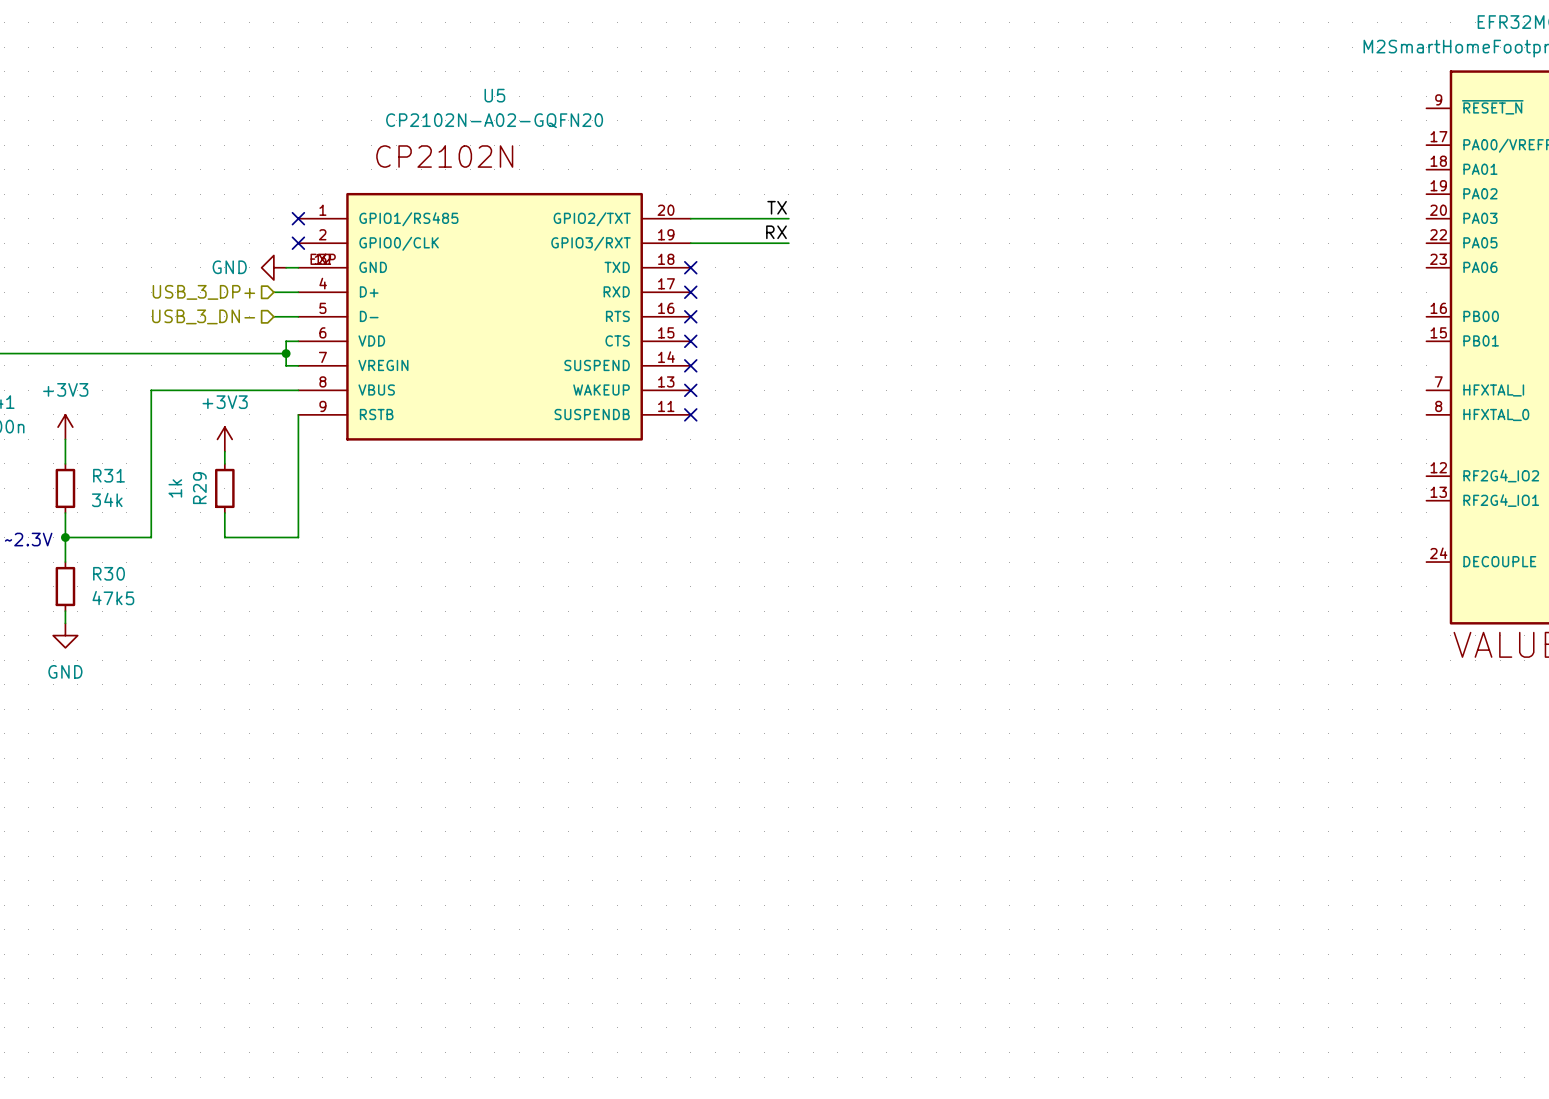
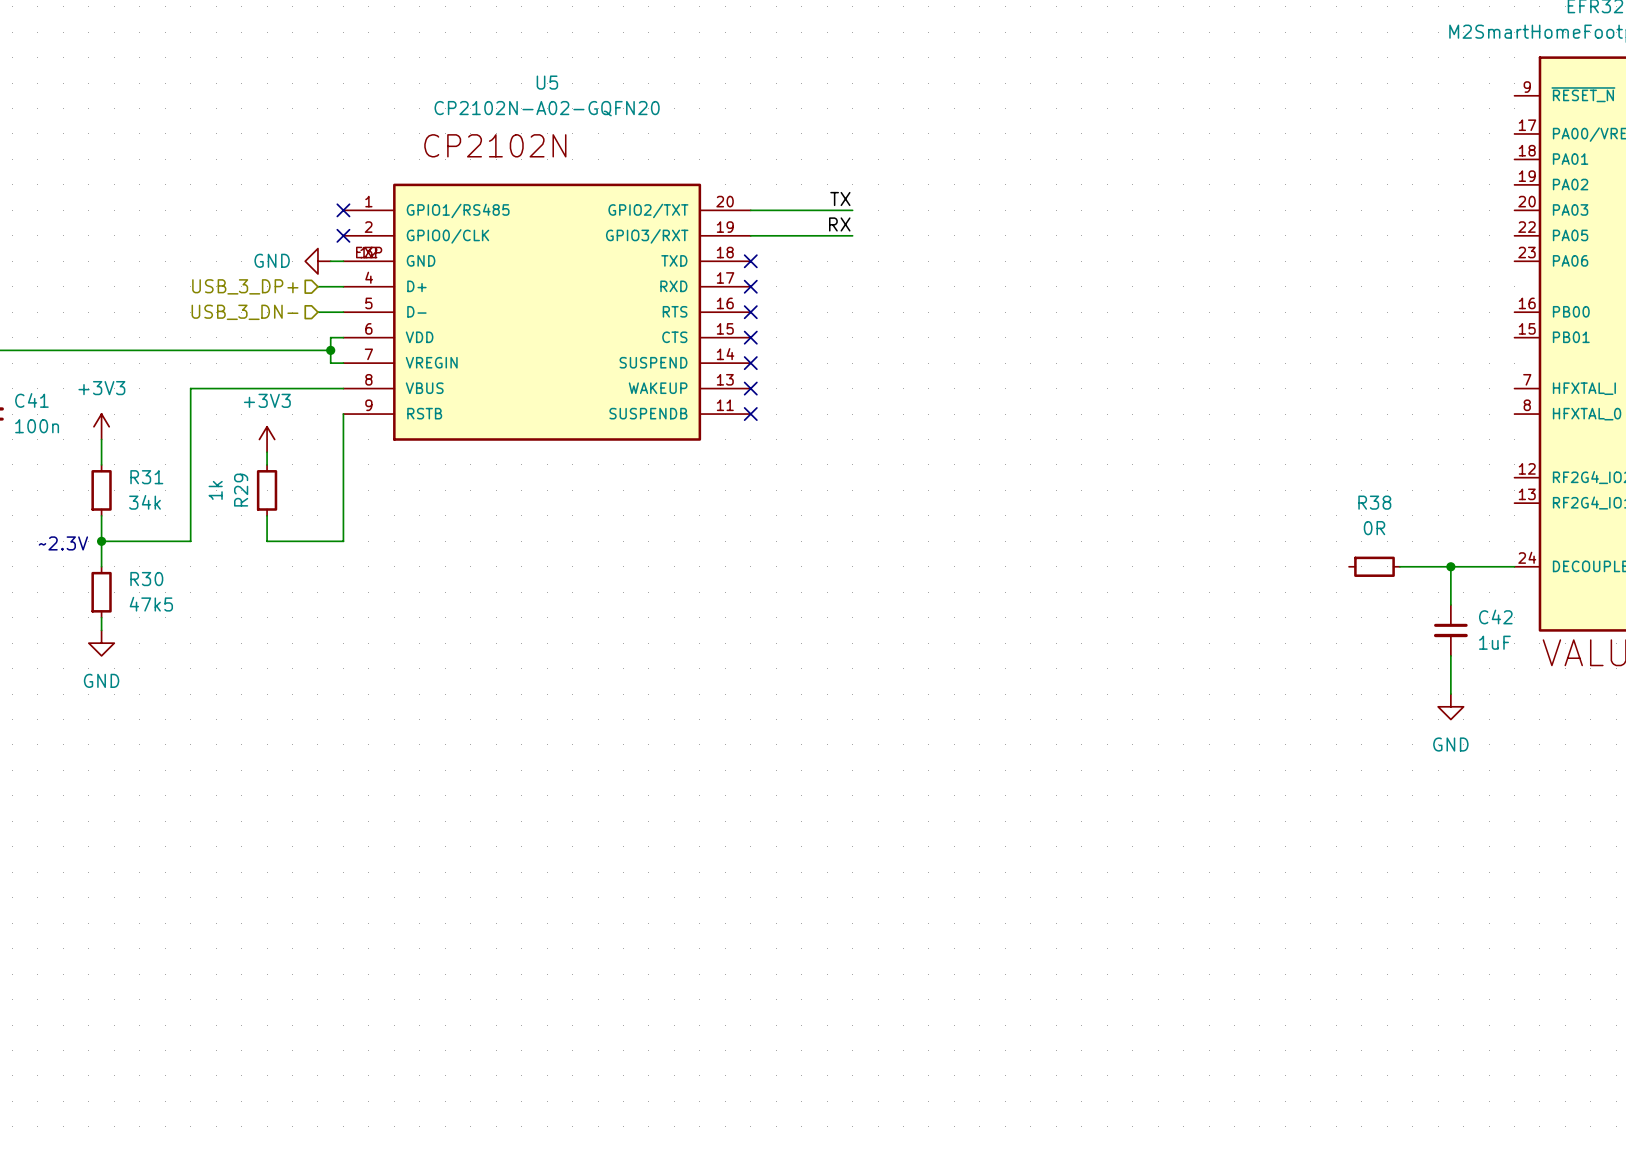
R38: none -> (1374, 566)
wire: none -> (1399, 566) (1514, 566)
wire: none -> (1450, 566) (1450, 604)
junction: none -> (1450, 566)
C42: none -> (1450, 630)
wire: none -> (1450, 655) (1450, 694)
power symbol: none -> GND (1450, 706)

